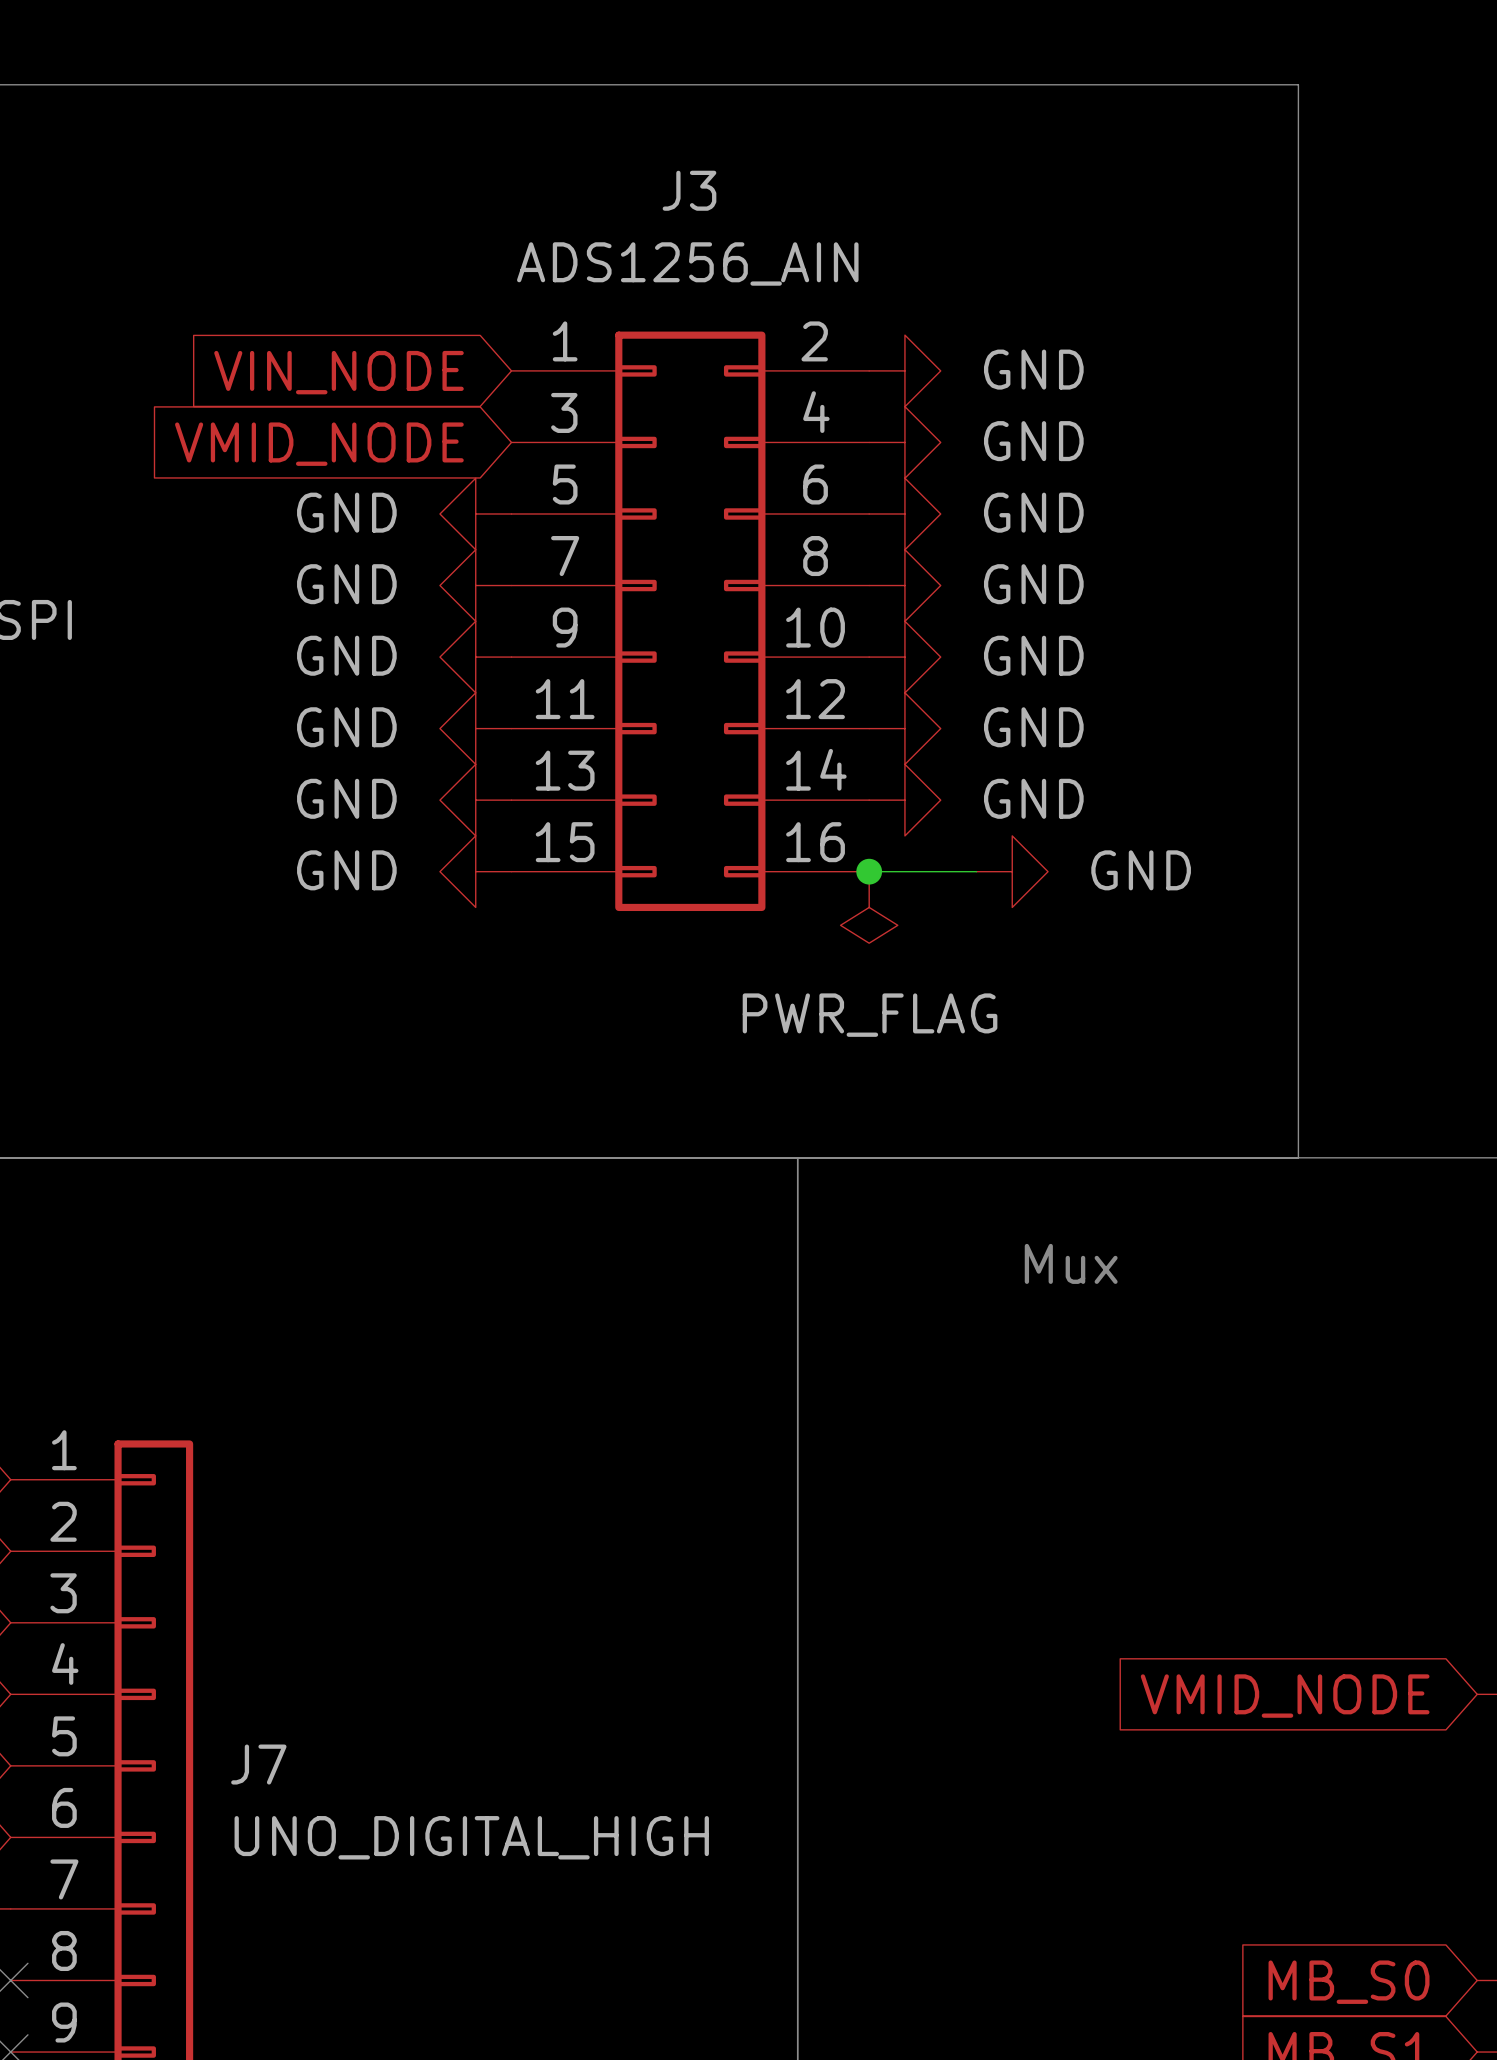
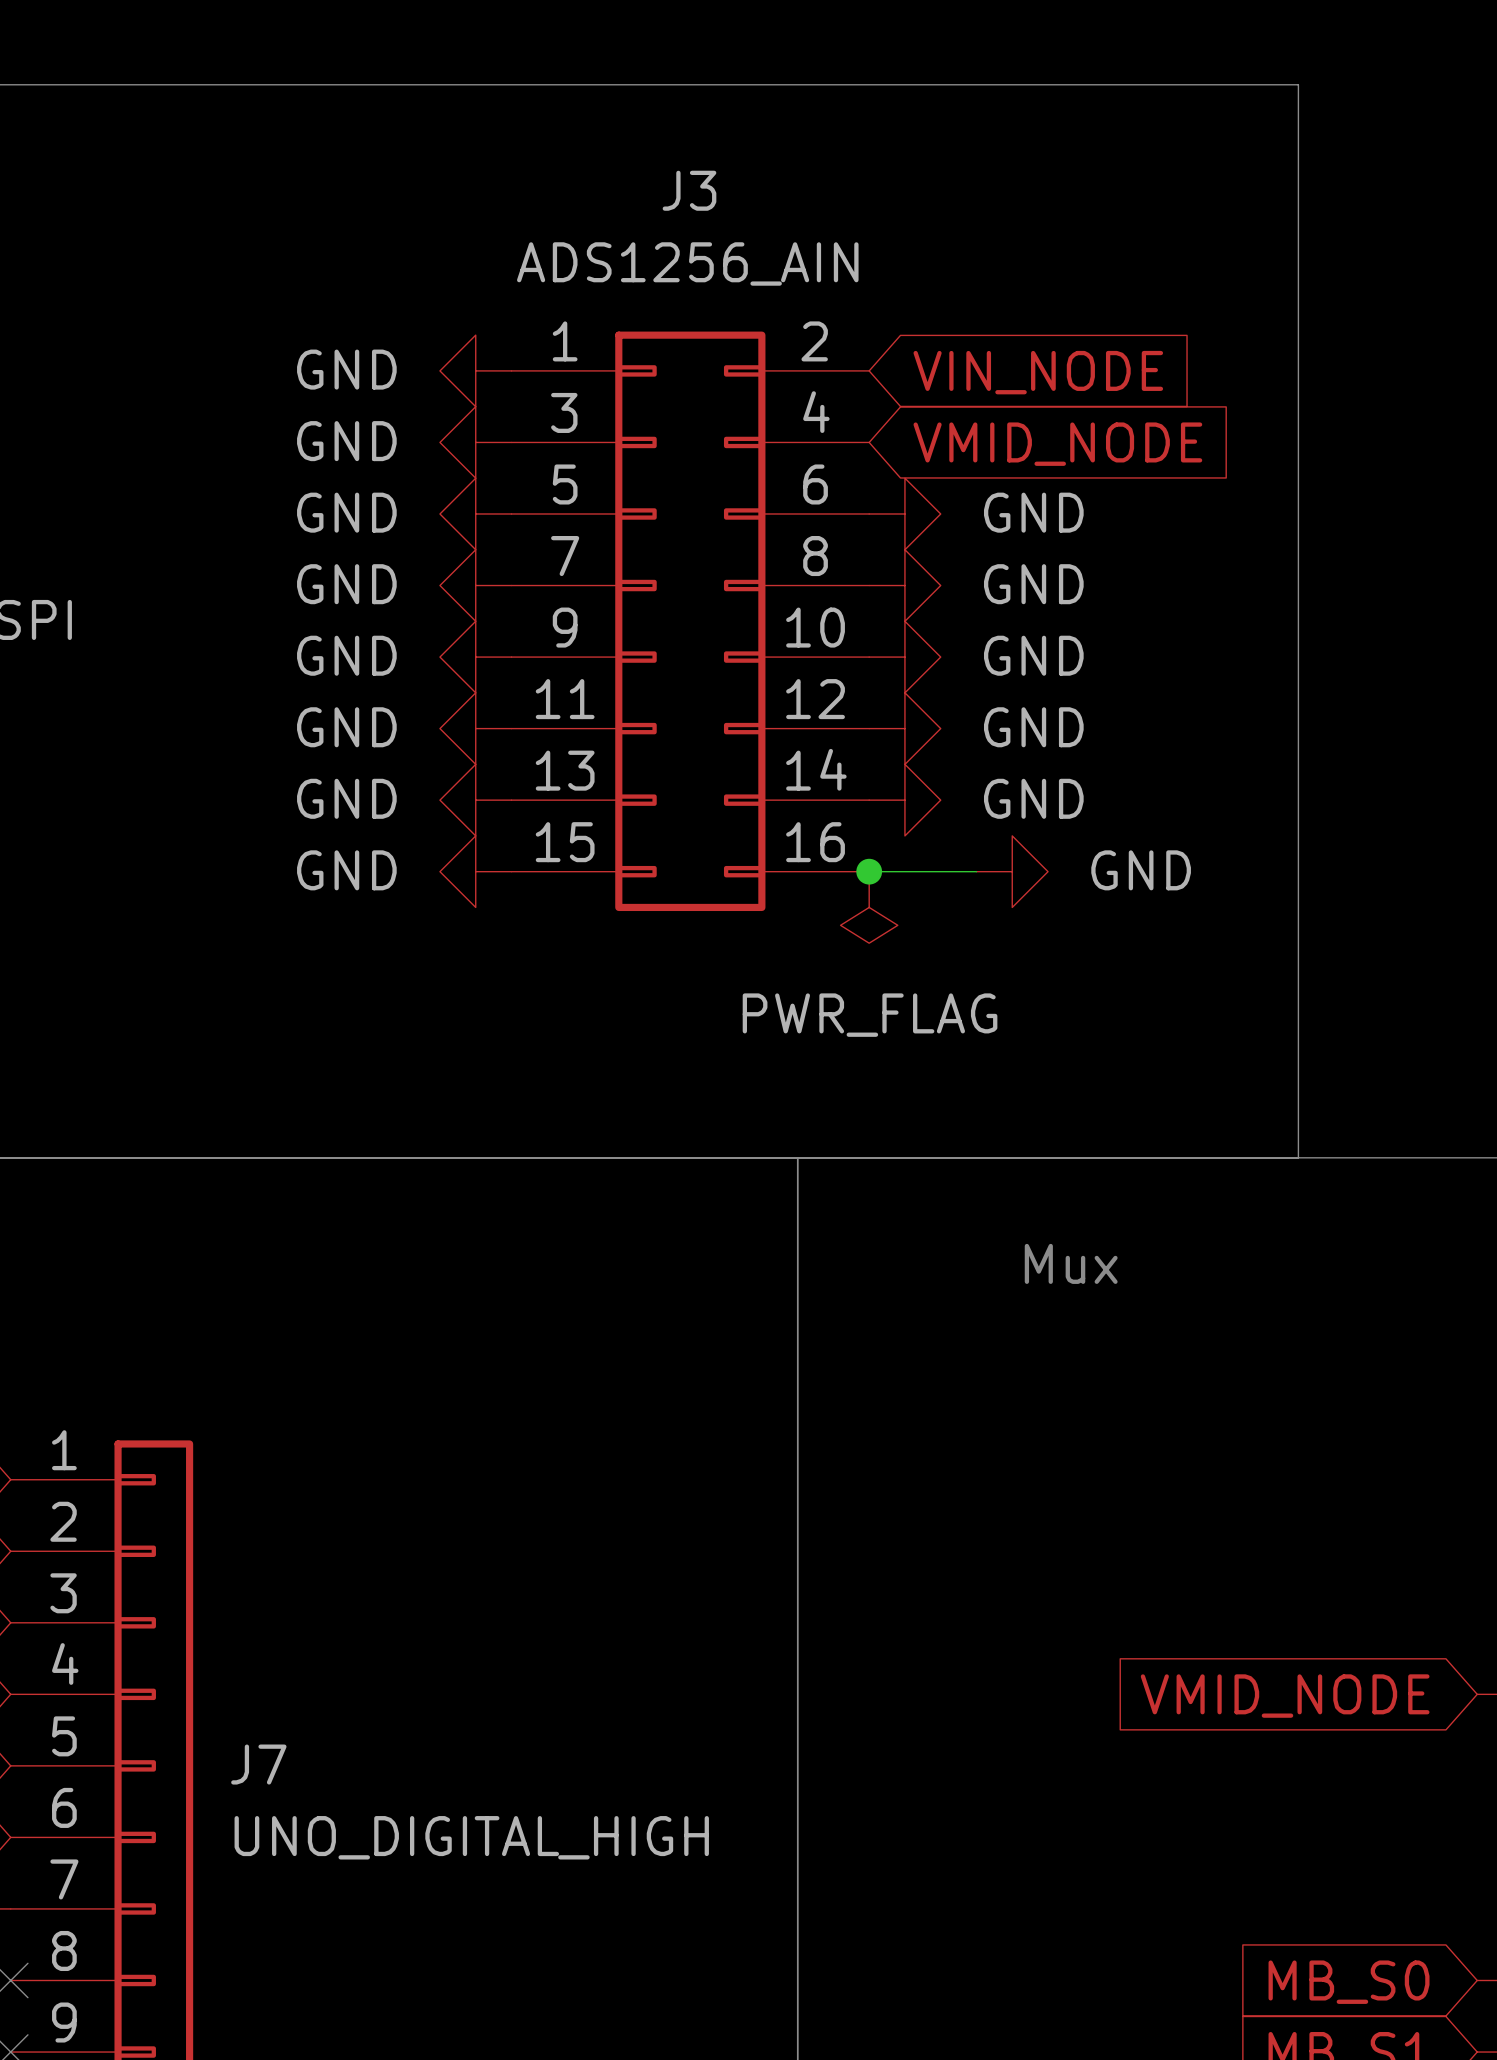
power symbol: none -> GND (475, 370)
power symbol: GND (904, 370) -> none
global label rotation: 0° (338, 372) -> 180° (1038, 372)
global label position: VIN_NODE (338, 372) -> VIN_NODE (1038, 372)
power symbol: none -> GND (475, 442)
power symbol: GND (904, 442) -> none
global label rotation: 0° (319, 444) -> 180° (1057, 444)
global label position: VMID_NODE (319, 444) -> VMID_NODE (1057, 444)

